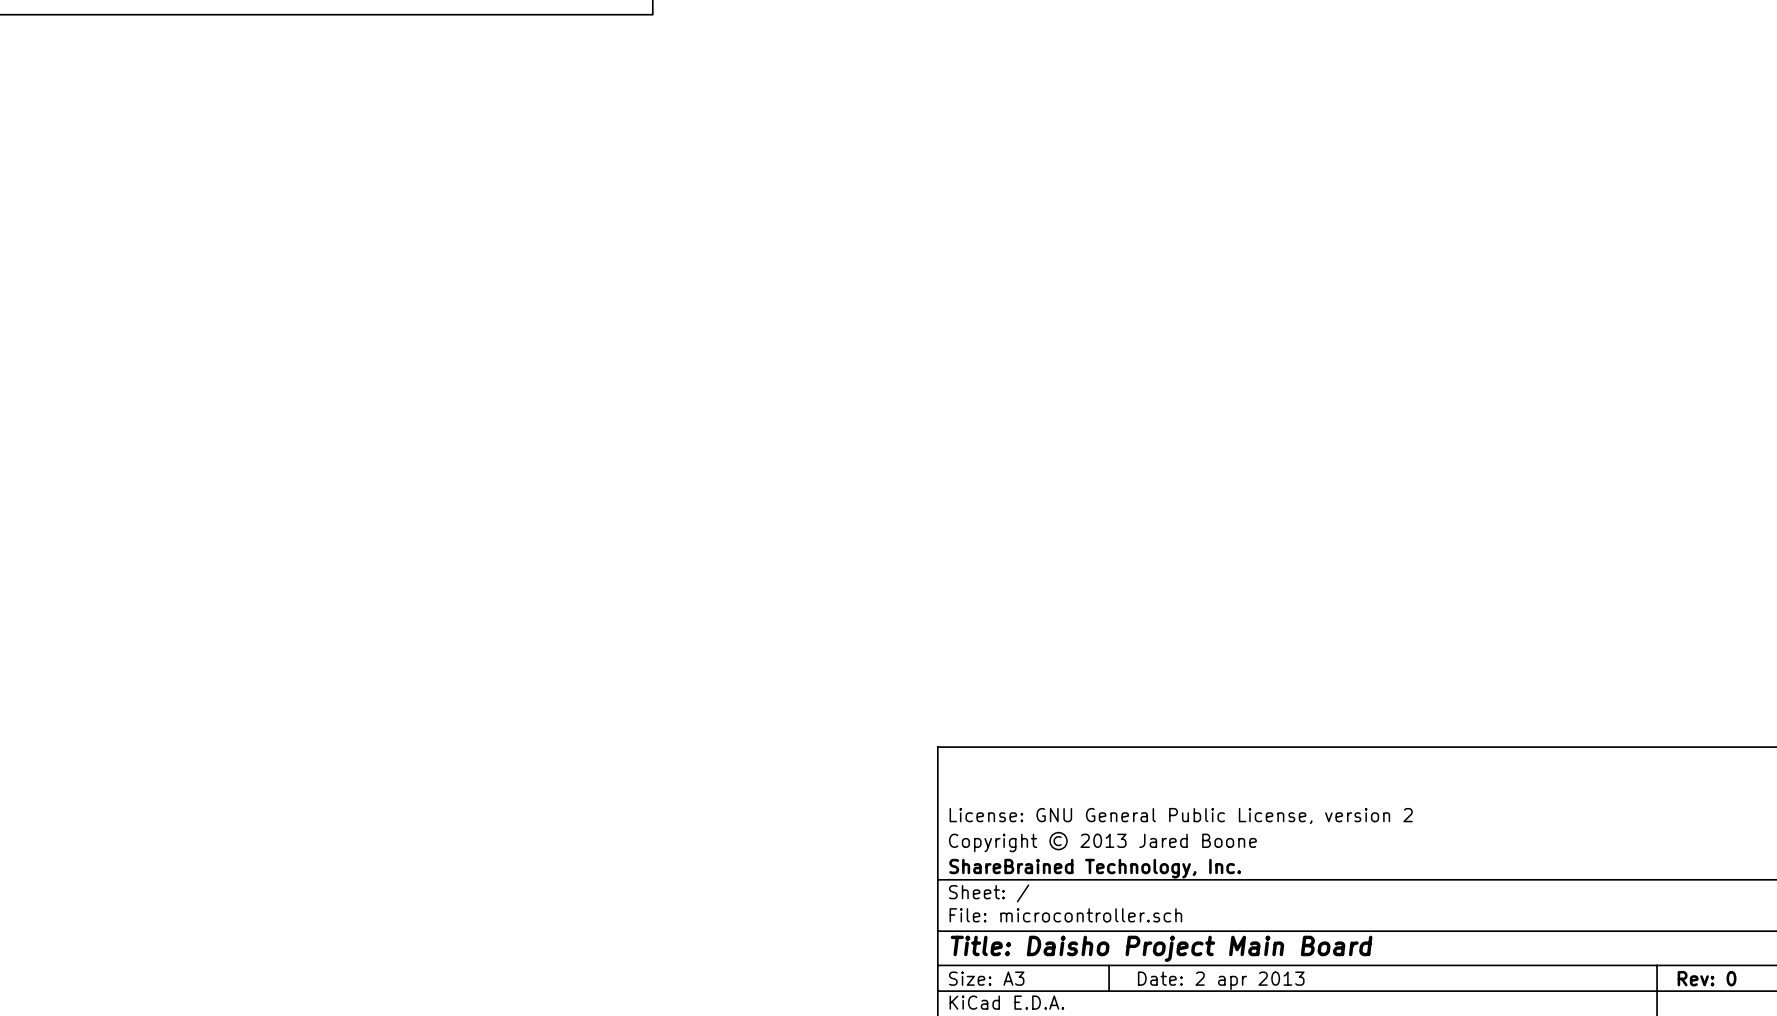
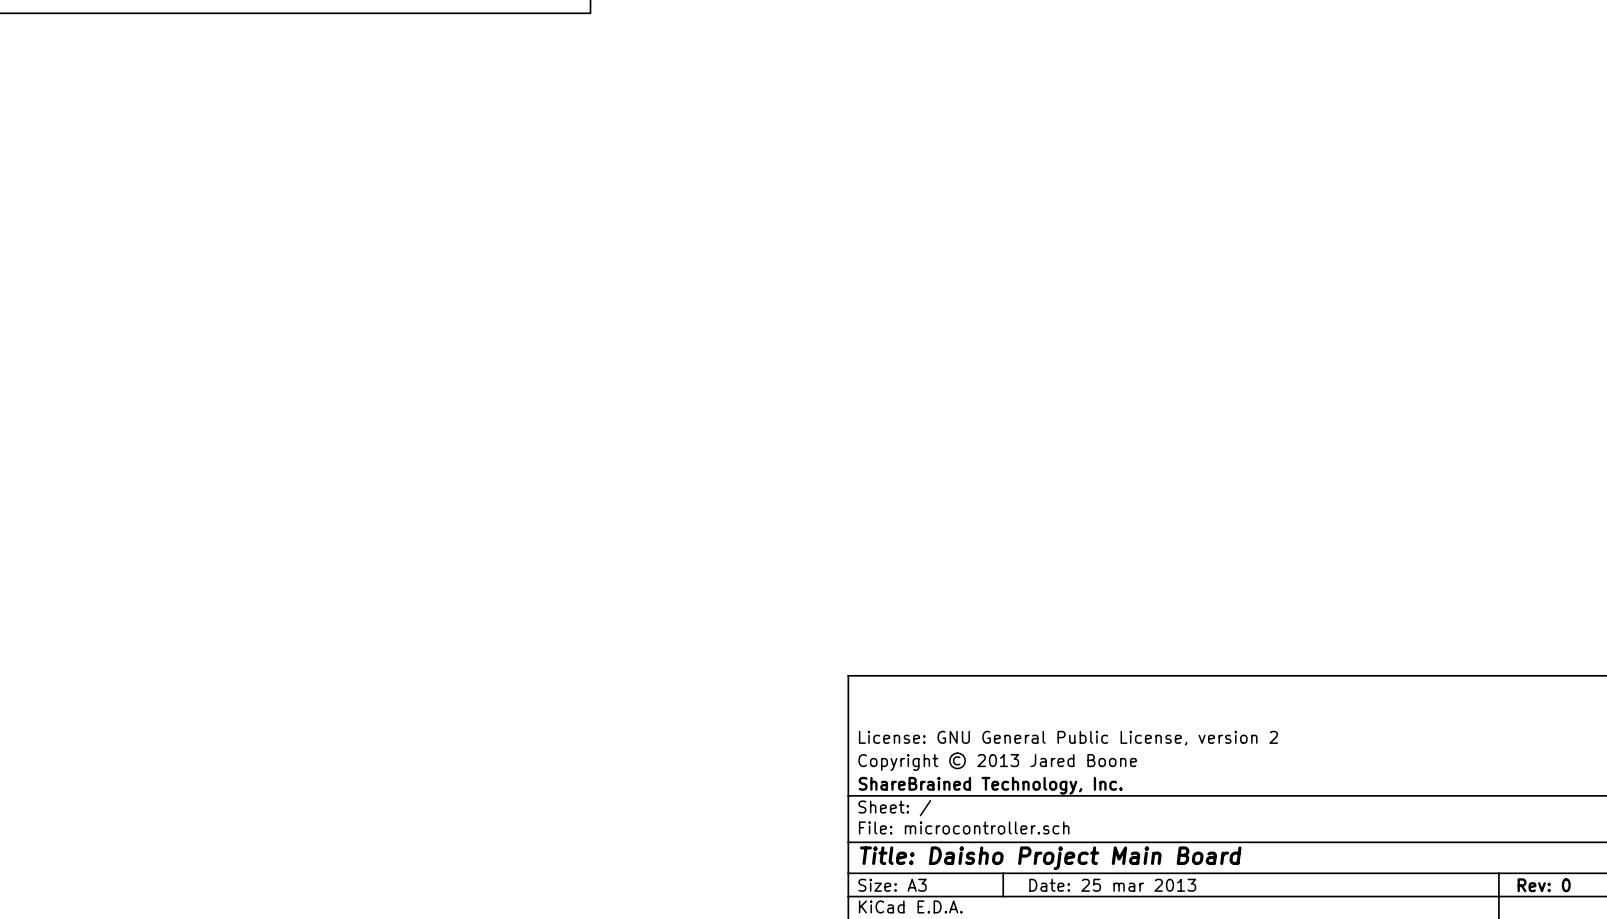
title block: Date: 2 apr 2013 (1221, 980) -> Date: 25 mar 2013 (1112, 885)

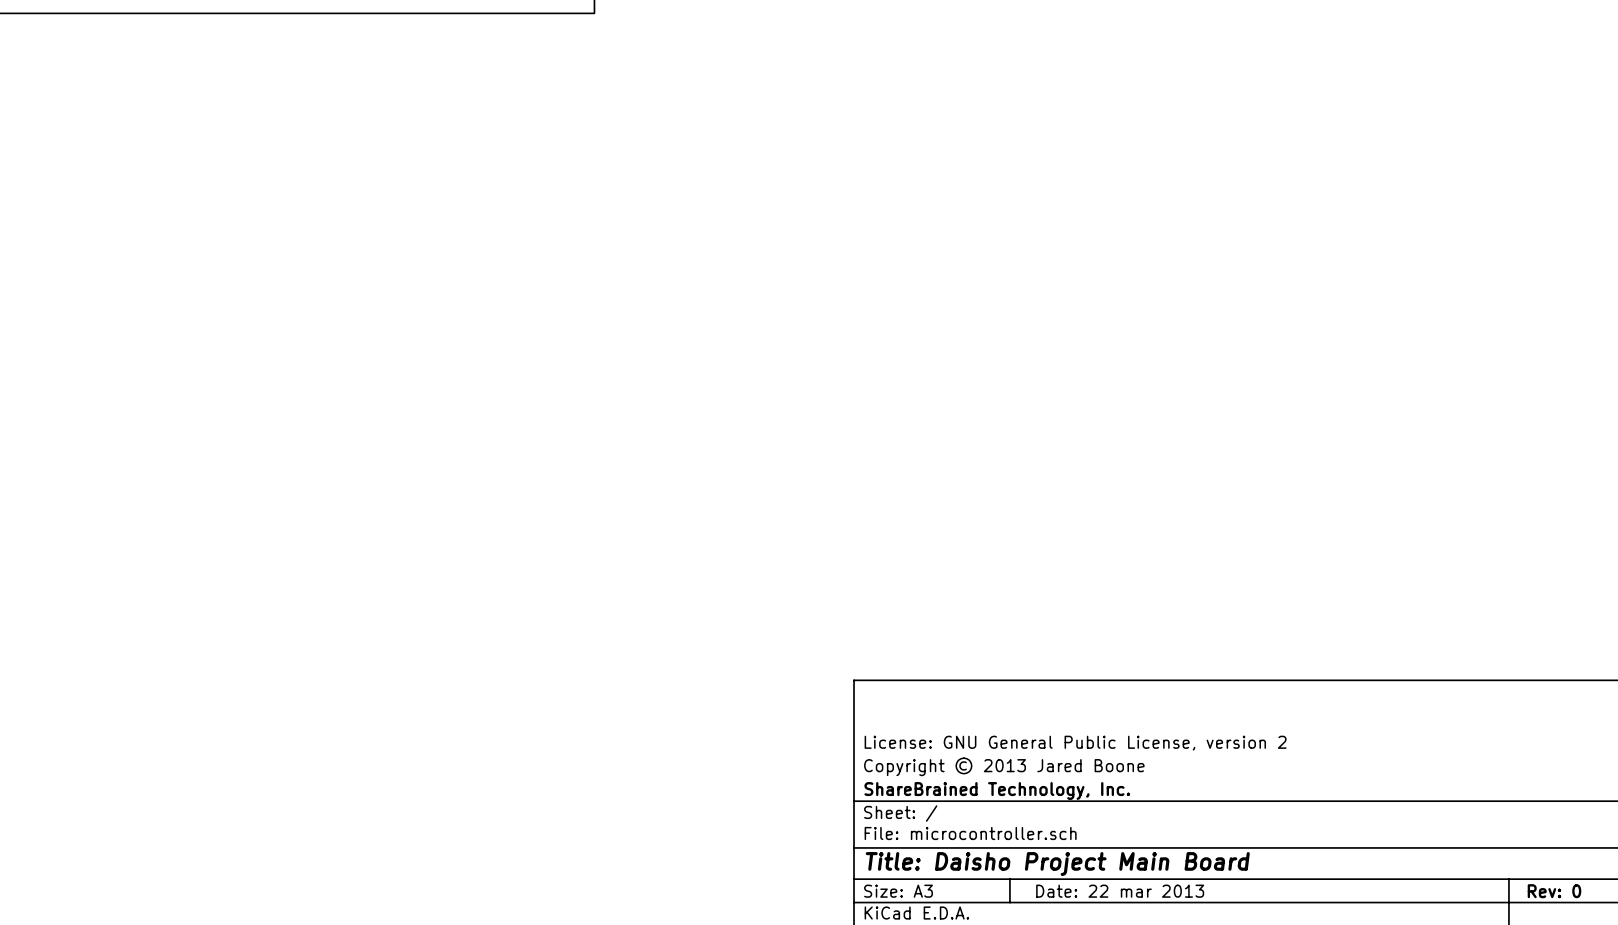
title block: Date: 25 mar 2013 (1112, 885) -> Date: 22 mar 2013 (1120, 891)

